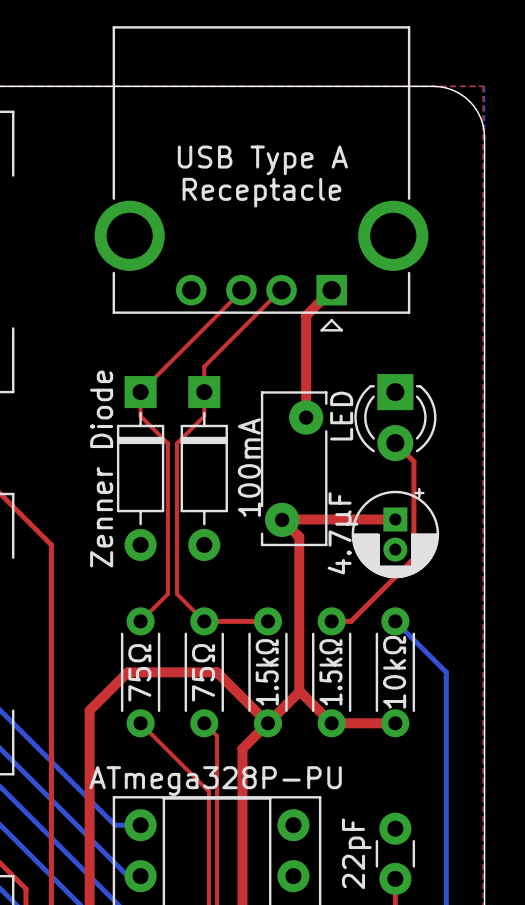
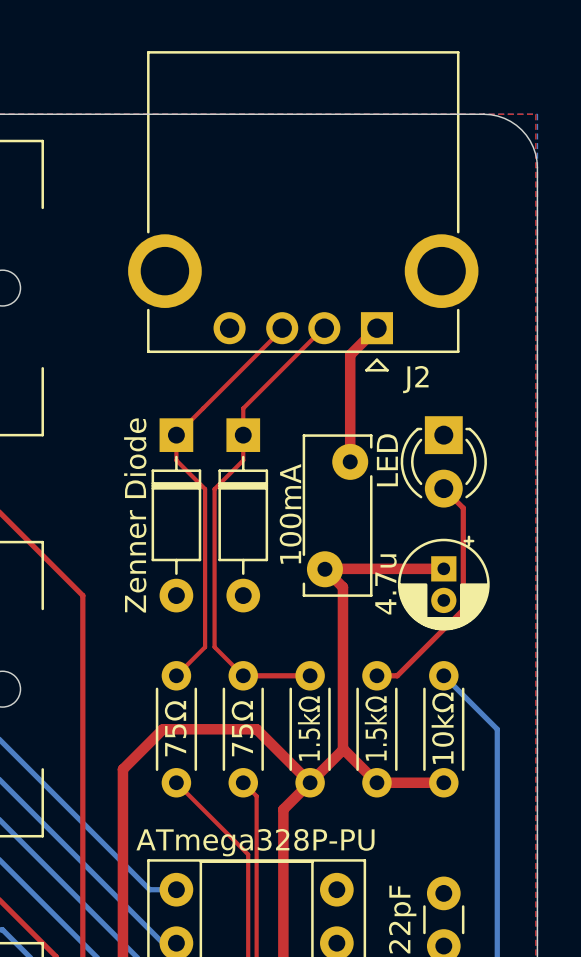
text: USB Type A (262, 160) -> none
text: Receptacle (261, 192) -> none
J2 name: none -> J2 (415, 379)
part value: 4.7μF (342, 533) -> 4.7u (386, 584)

